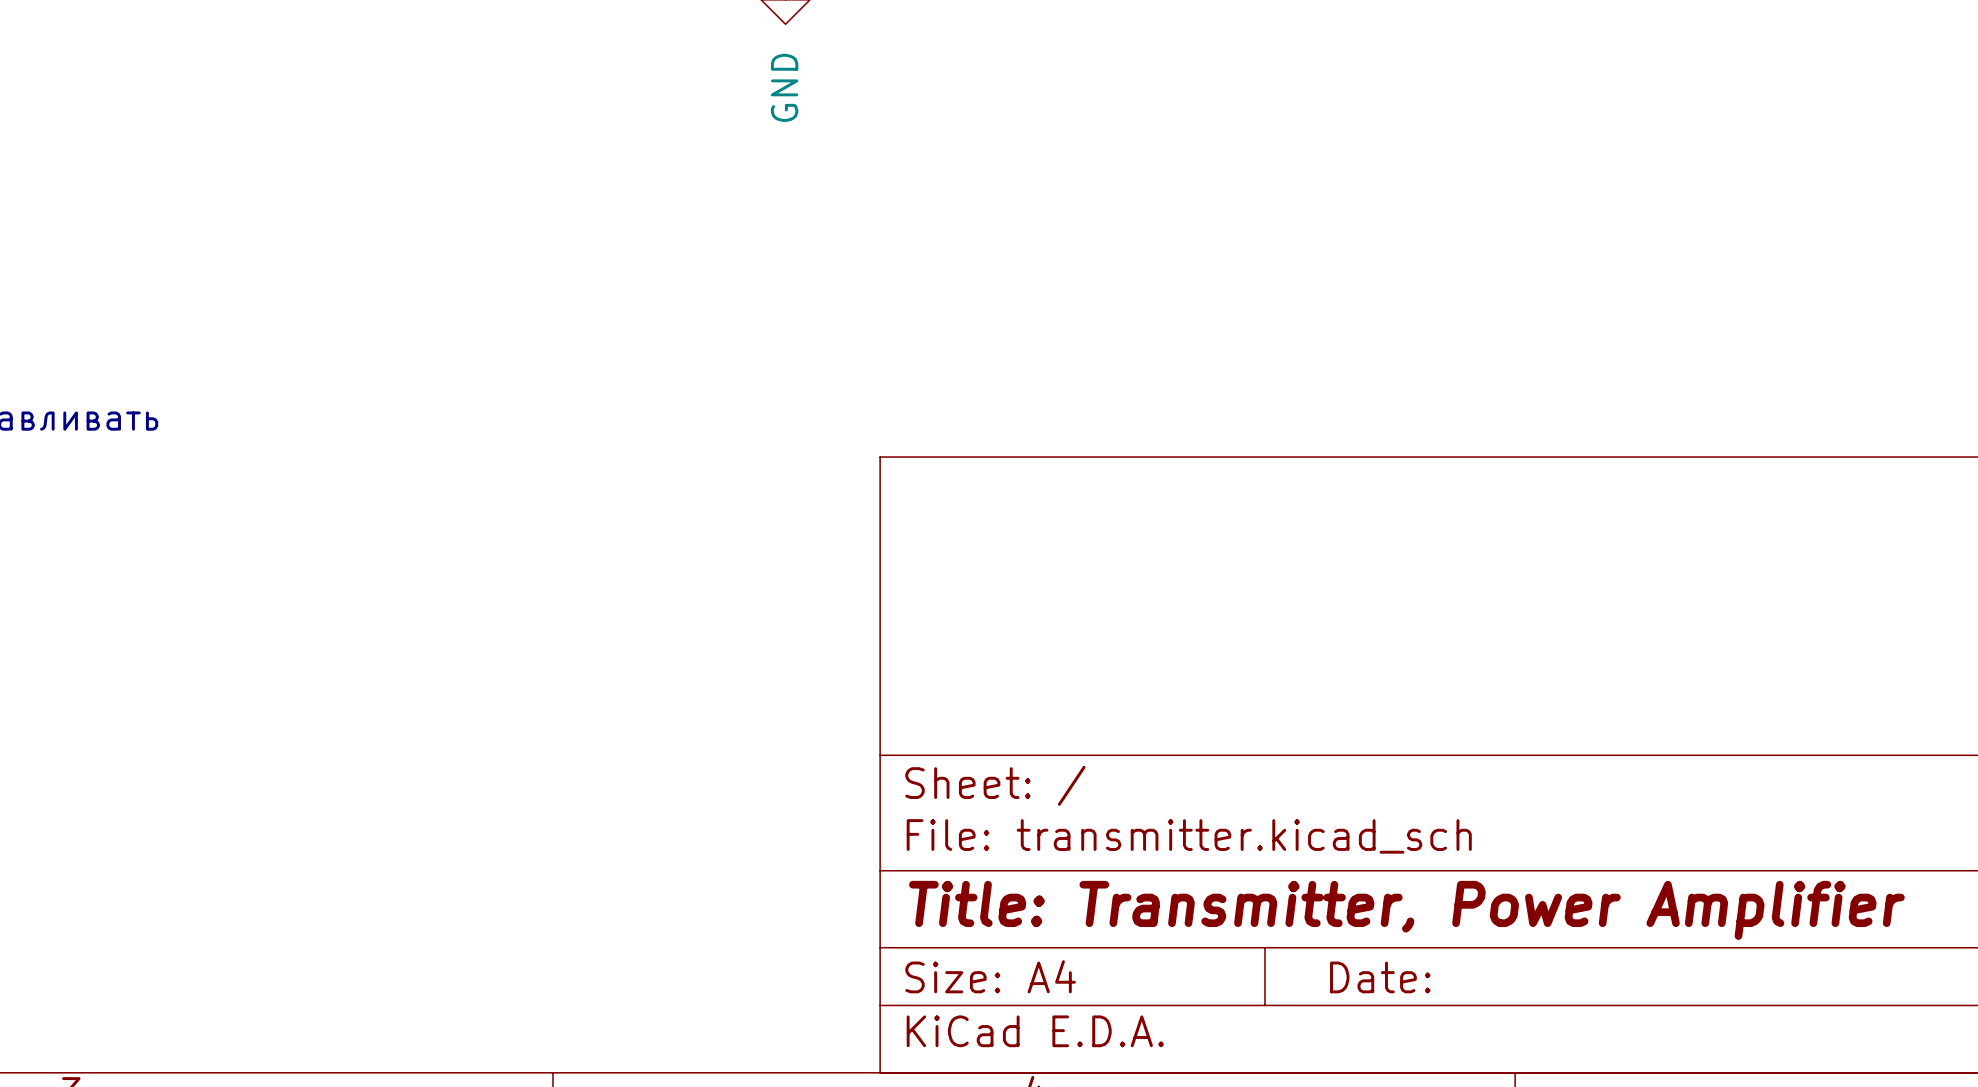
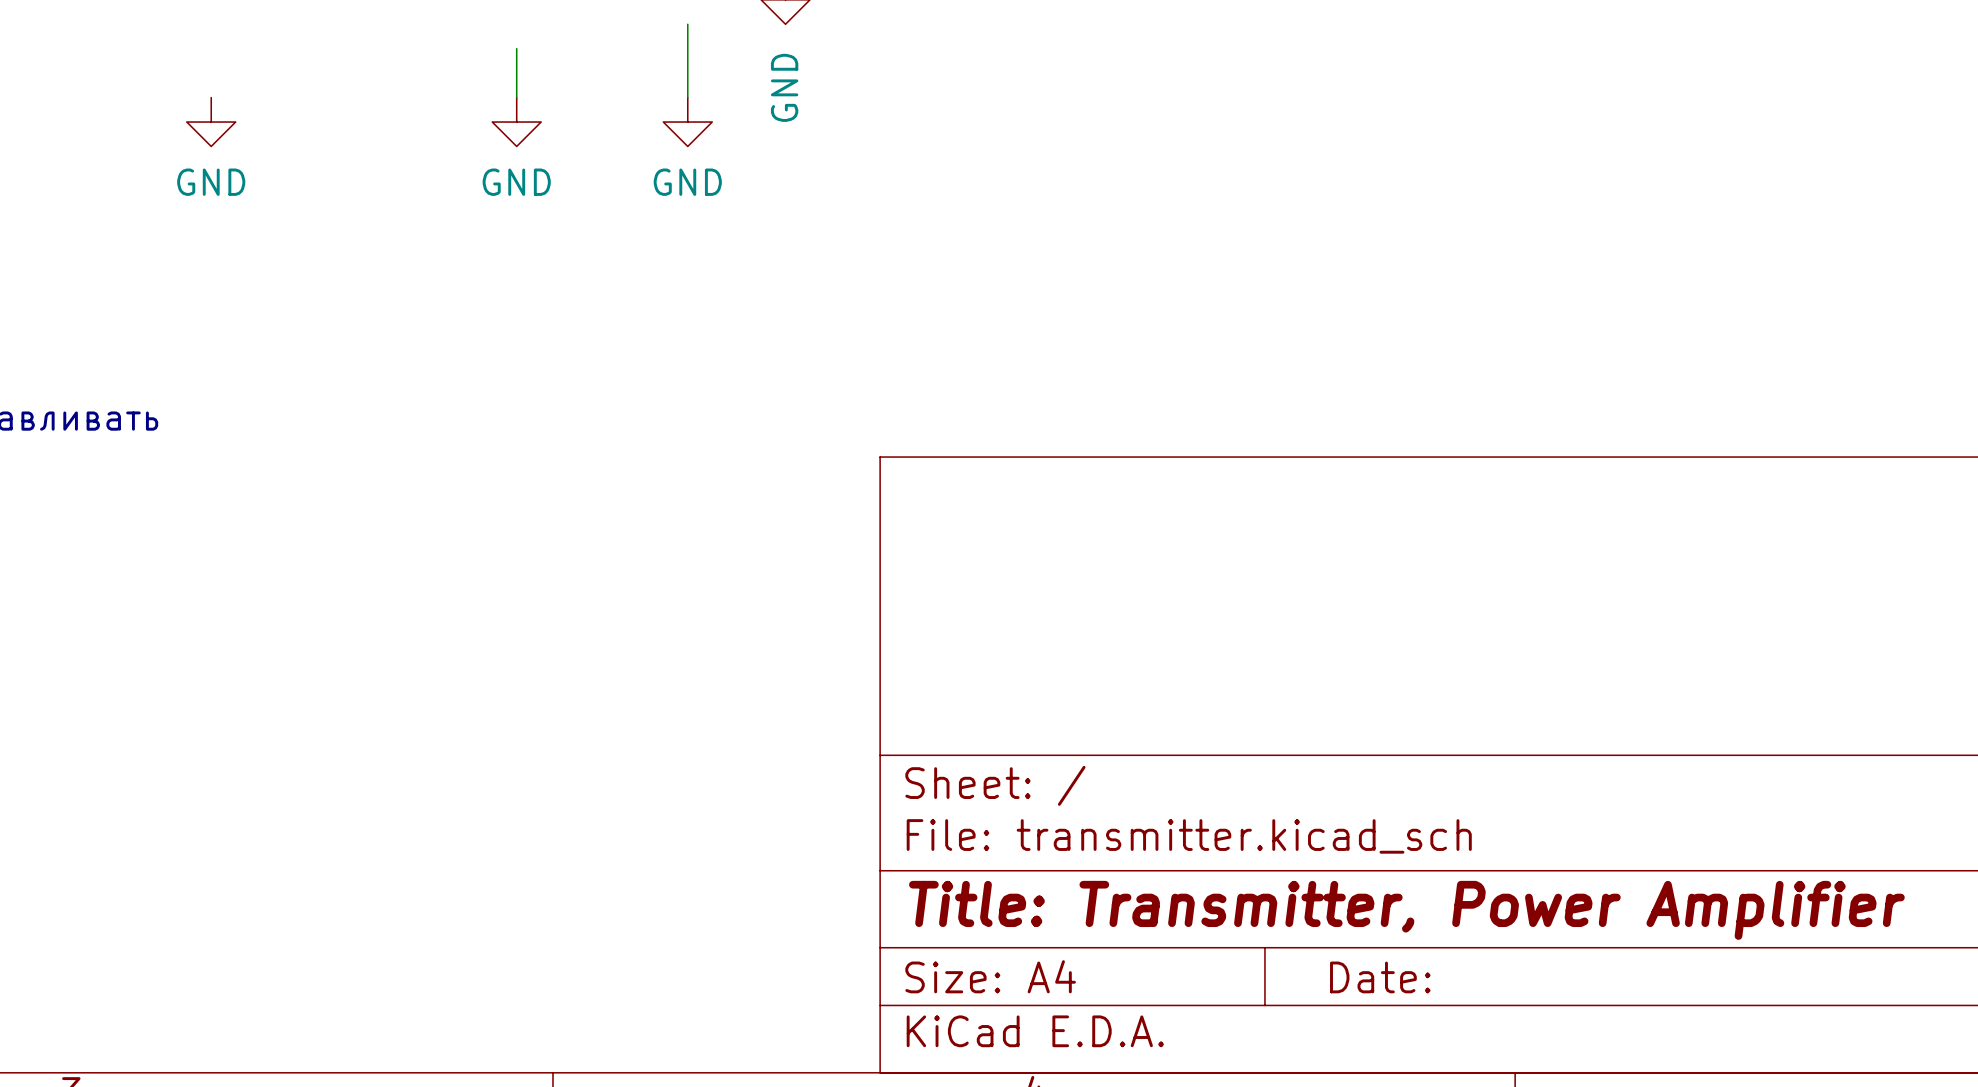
wire: none -> (687, 24) (687, 97)
wire: none -> (516, 48) (516, 97)
power symbol: none -> GND (211, 122)
power symbol: none -> GND (516, 122)
power symbol: none -> GND (687, 122)

